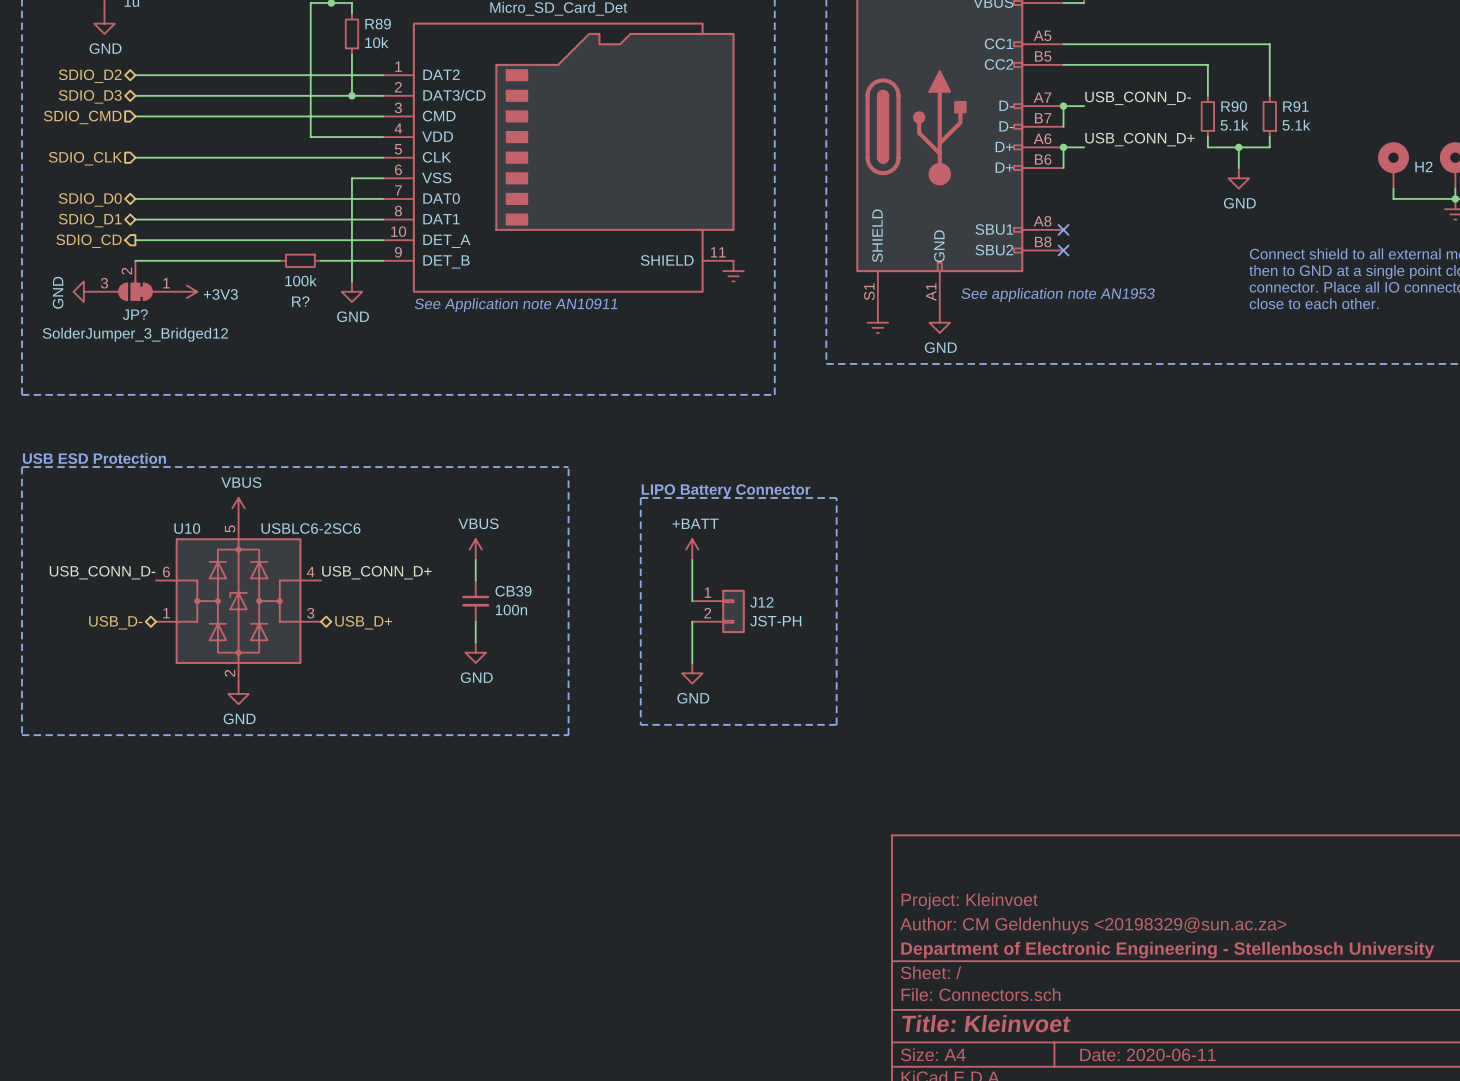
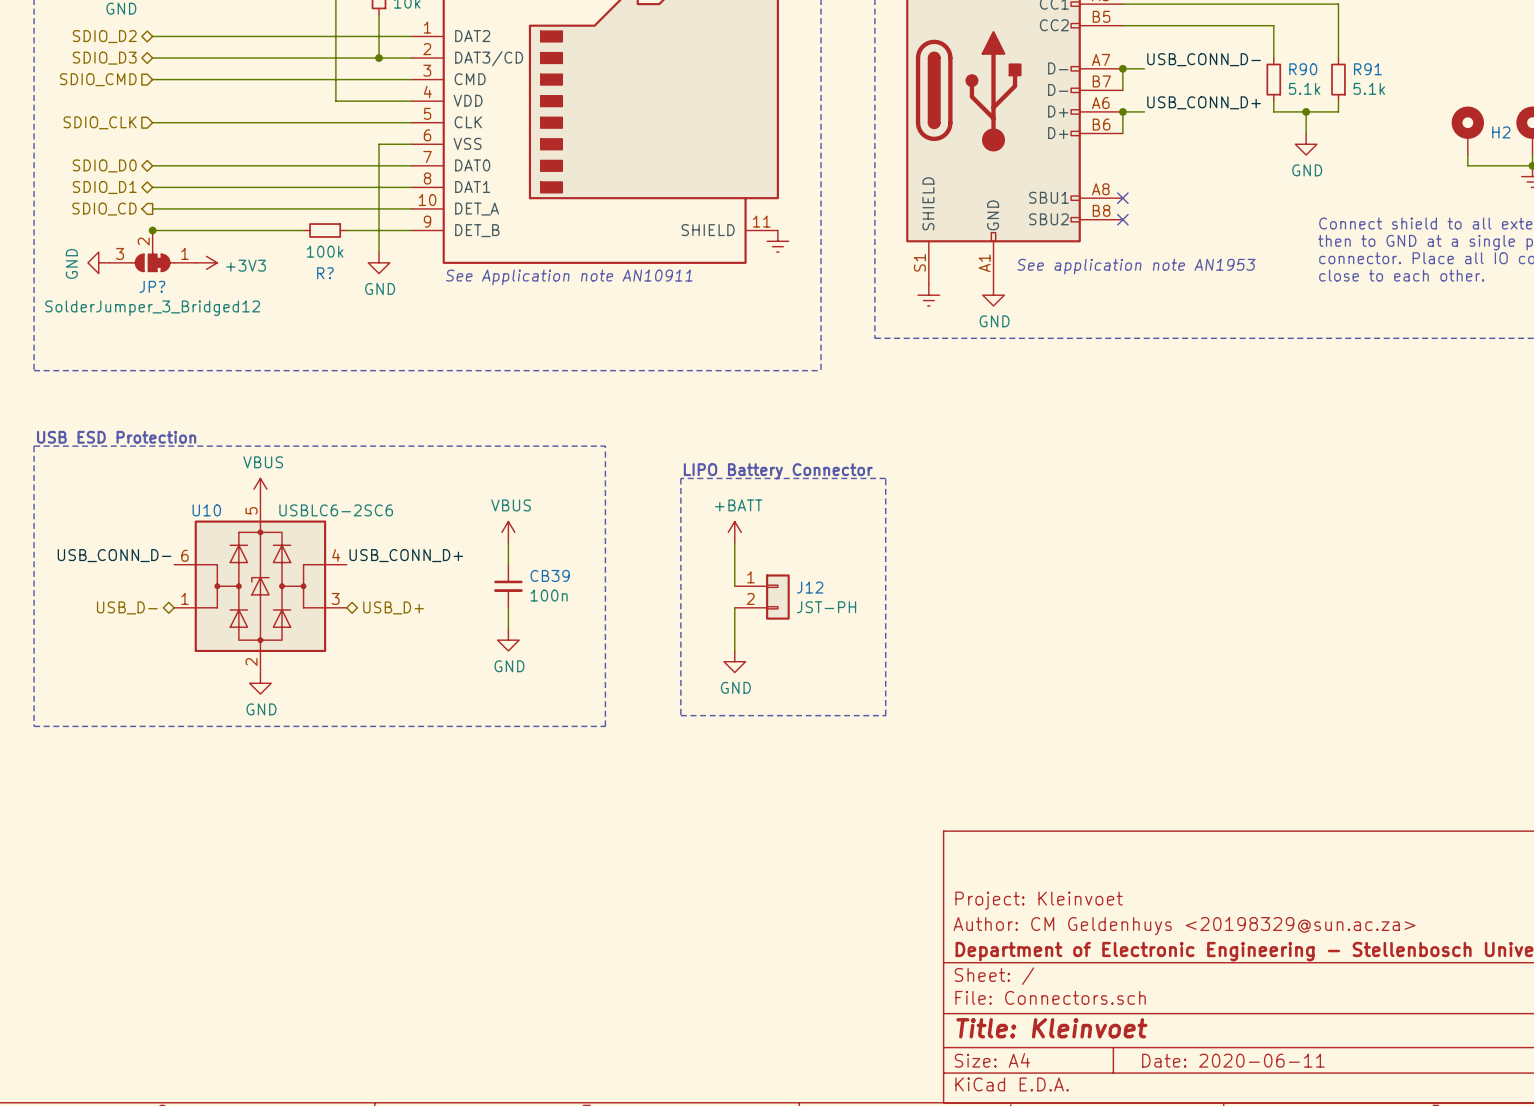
junction: none -> (152, 230)

